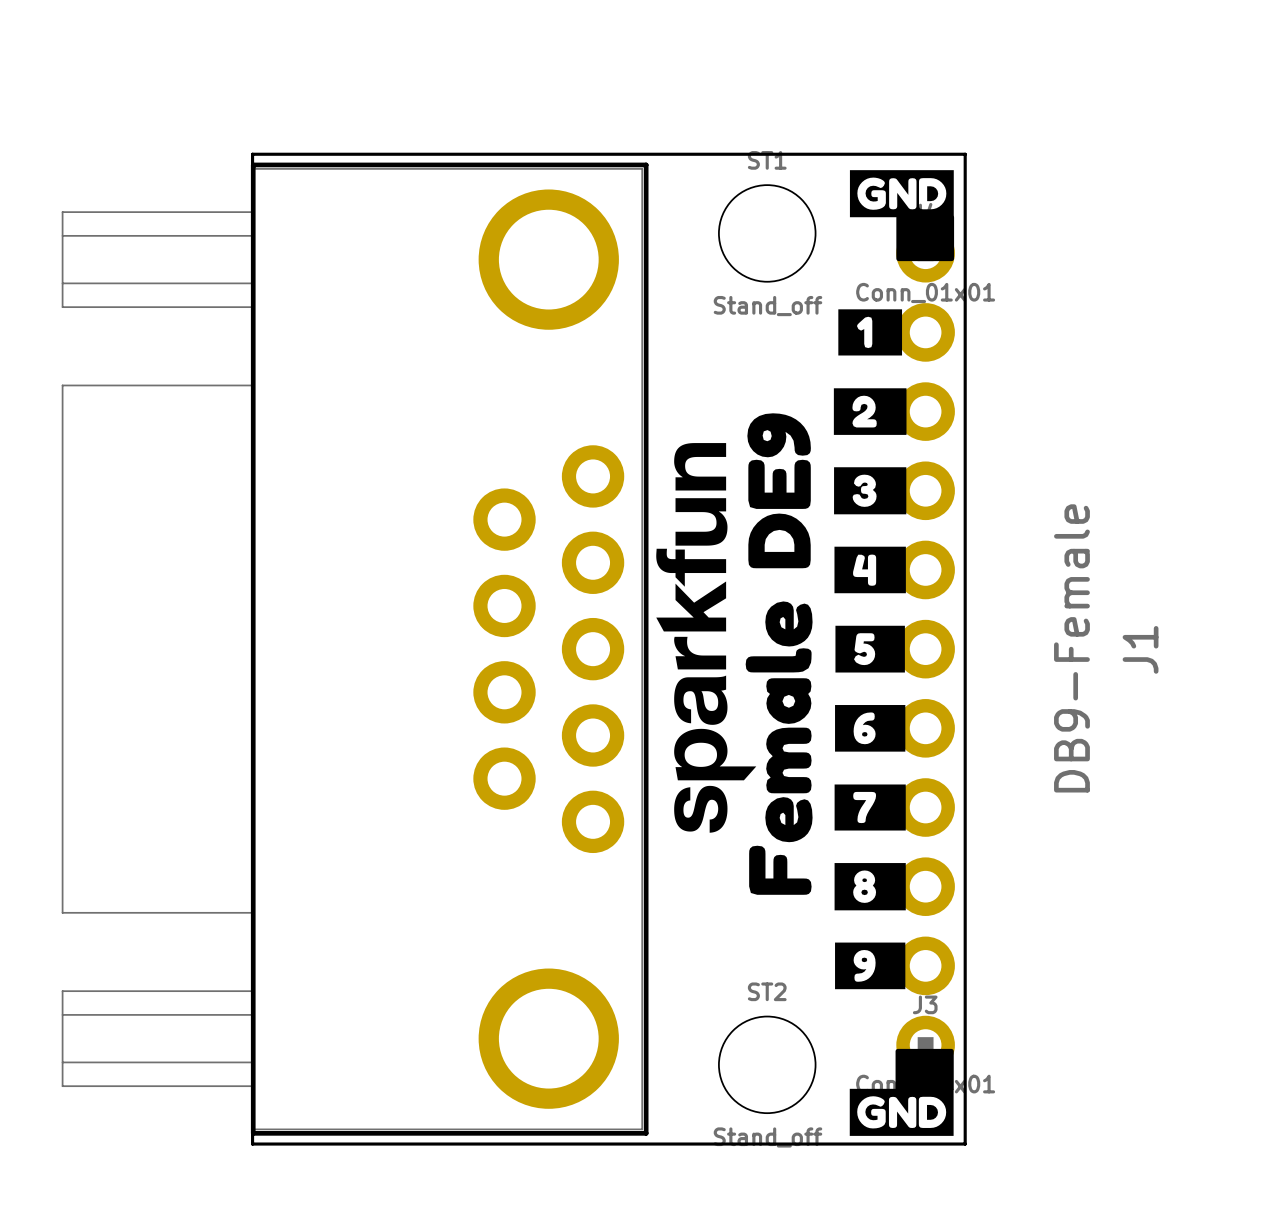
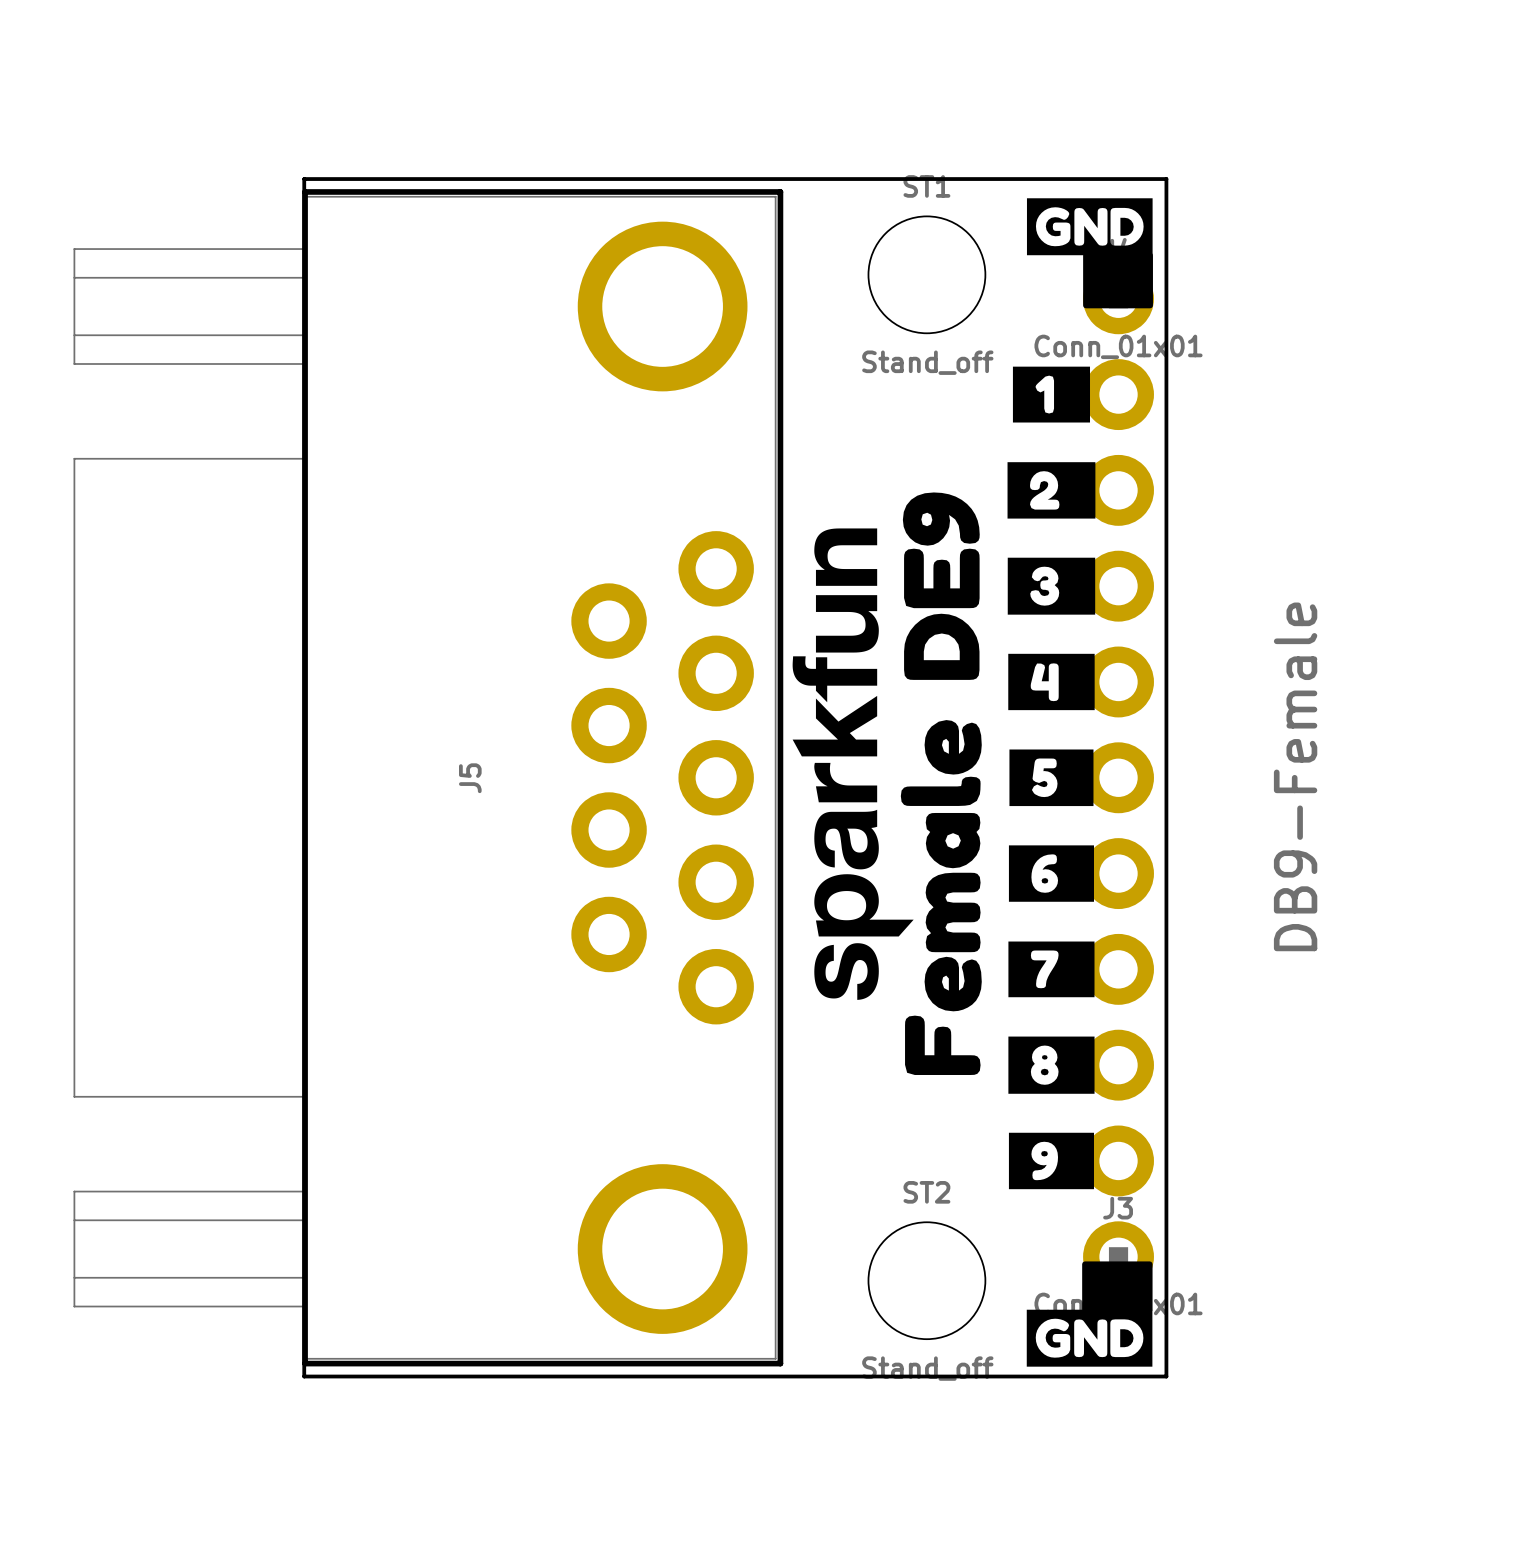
J1 name: J1 (1140, 649) -> J5 (470, 778)

